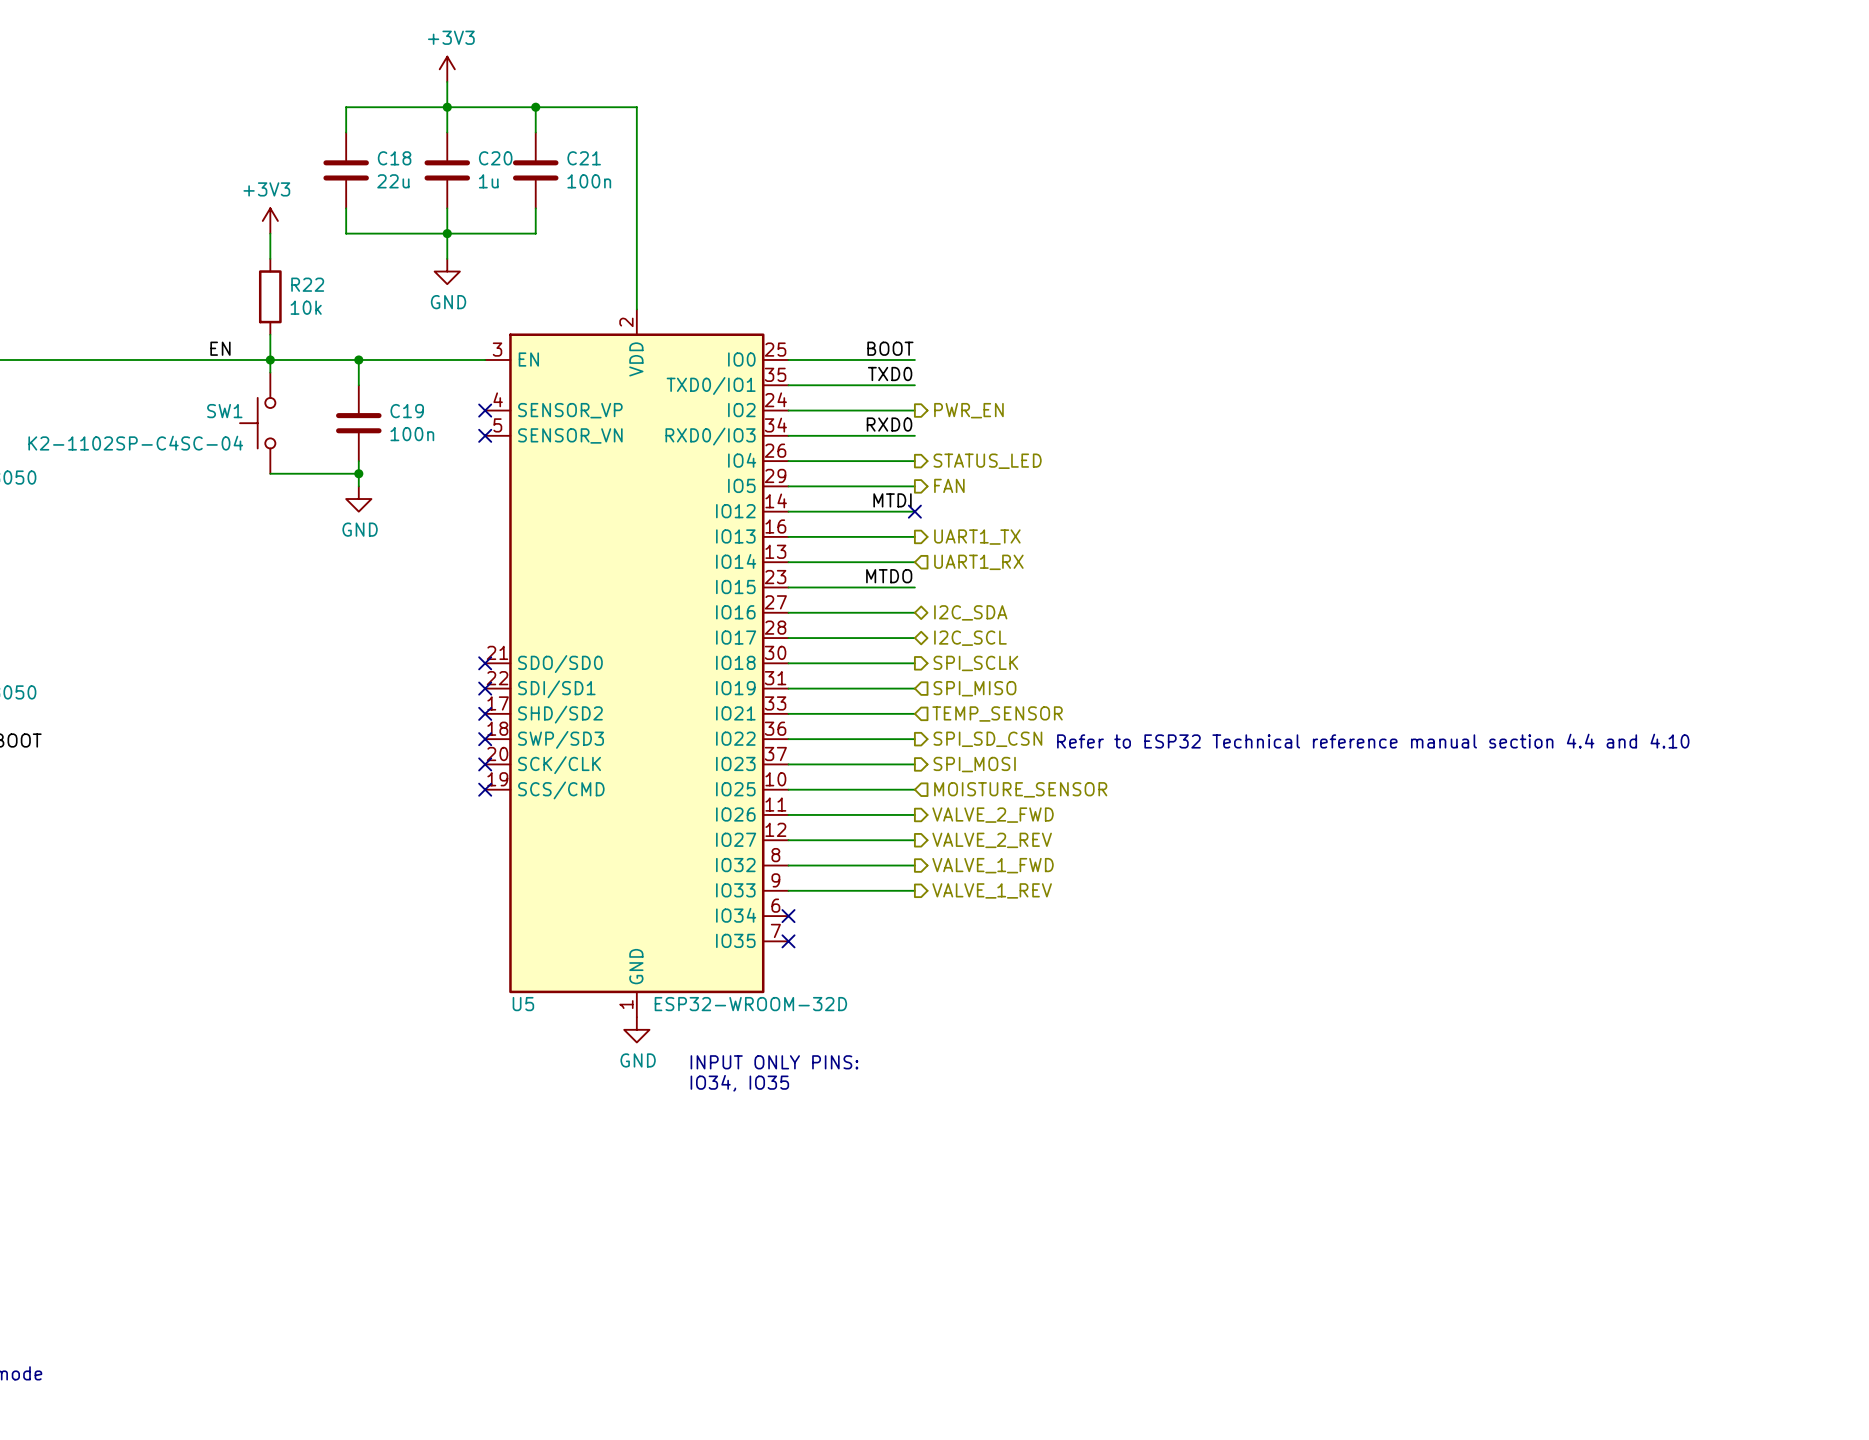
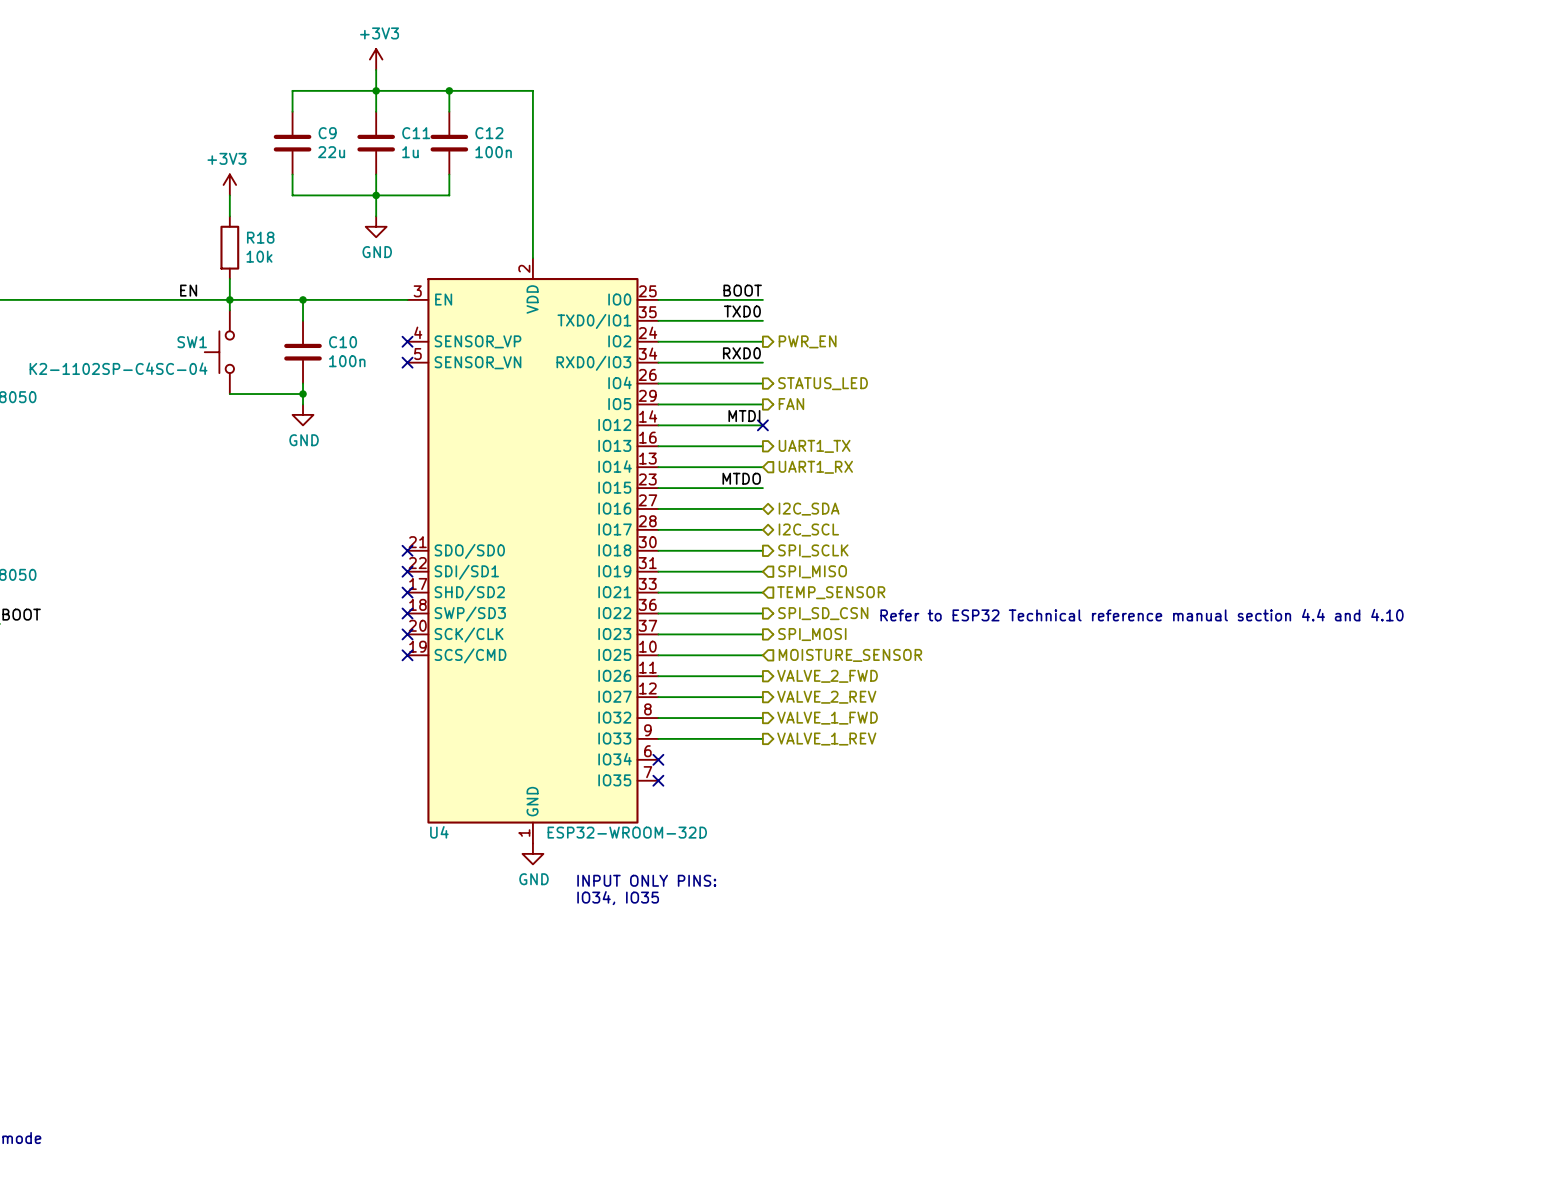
C18 name: C18 (394, 158) -> C9 (327, 133)
C20 name: C20 (495, 158) -> C11 (416, 133)
C21 name: C21 (584, 158) -> C12 (489, 133)
R22 name: R22 (307, 284) -> R18 (260, 237)
C19 name: C19 (407, 411) -> C10 (343, 342)
U5 name: U5 (523, 1004) -> U4 (439, 832)

